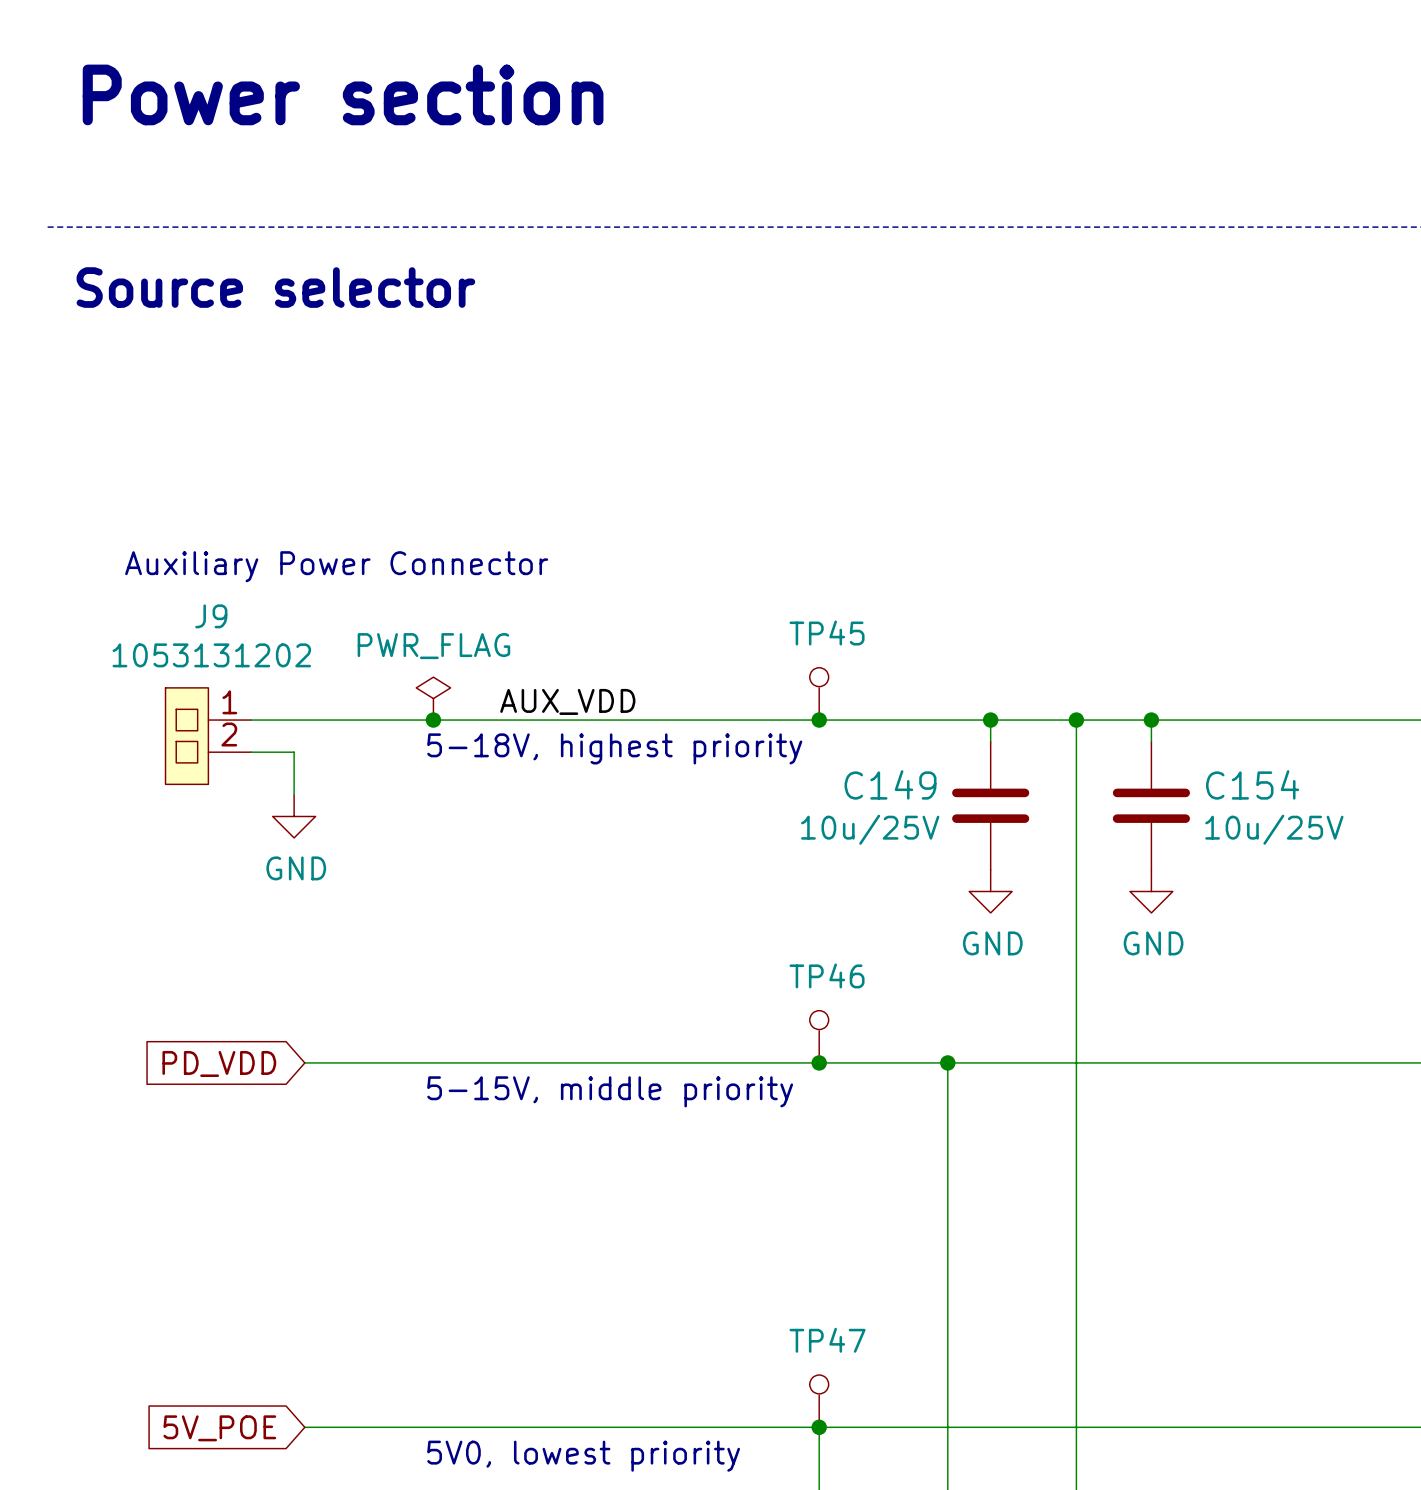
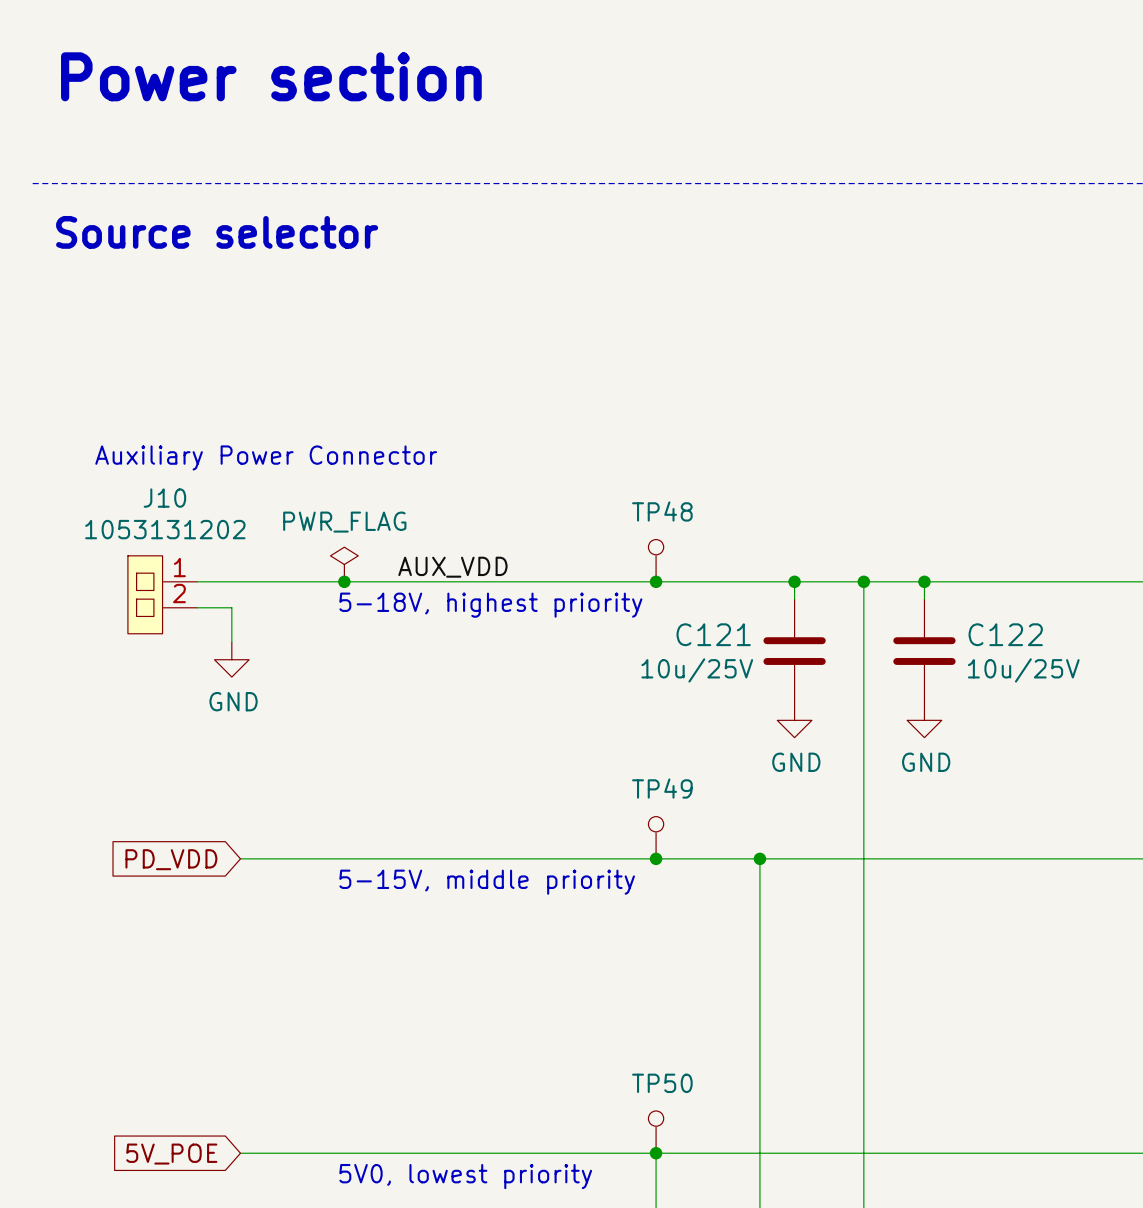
J9 name: J9 (211, 616) -> J10 (164, 498)
TP45 name: TP45 (827, 633) -> TP48 (662, 511)
C149 name: C149 (890, 784) -> C121 (713, 634)
C154 name: C154 (1252, 784) -> C122 (1005, 634)
TP46 name: TP46 (827, 975) -> TP49 (662, 788)
TP47 name: TP47 (827, 1340) -> TP50 (662, 1083)

